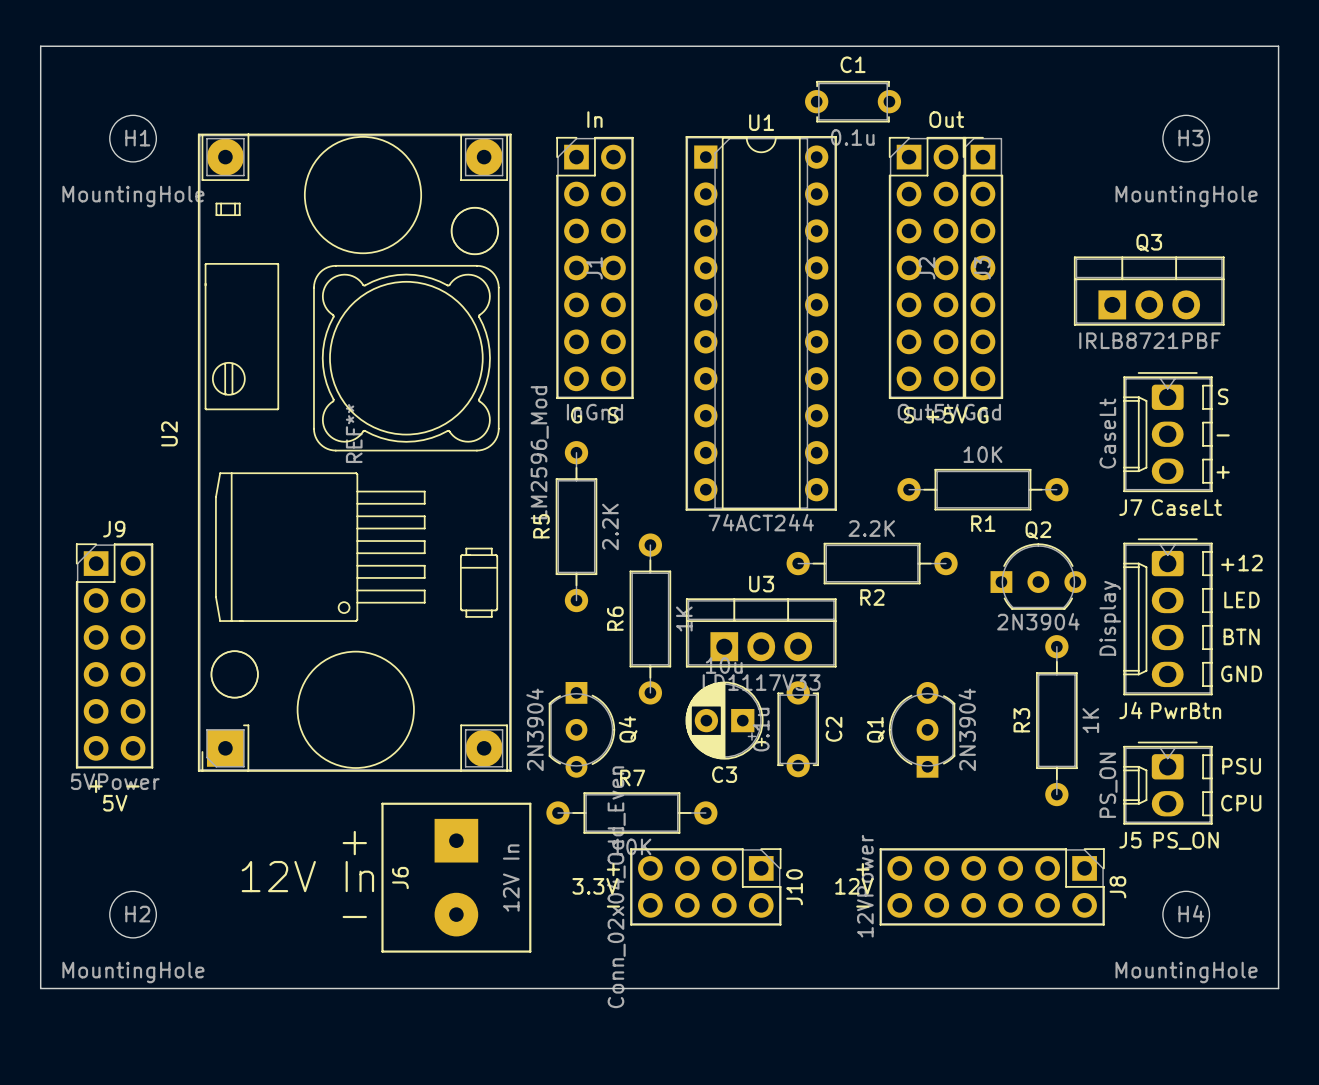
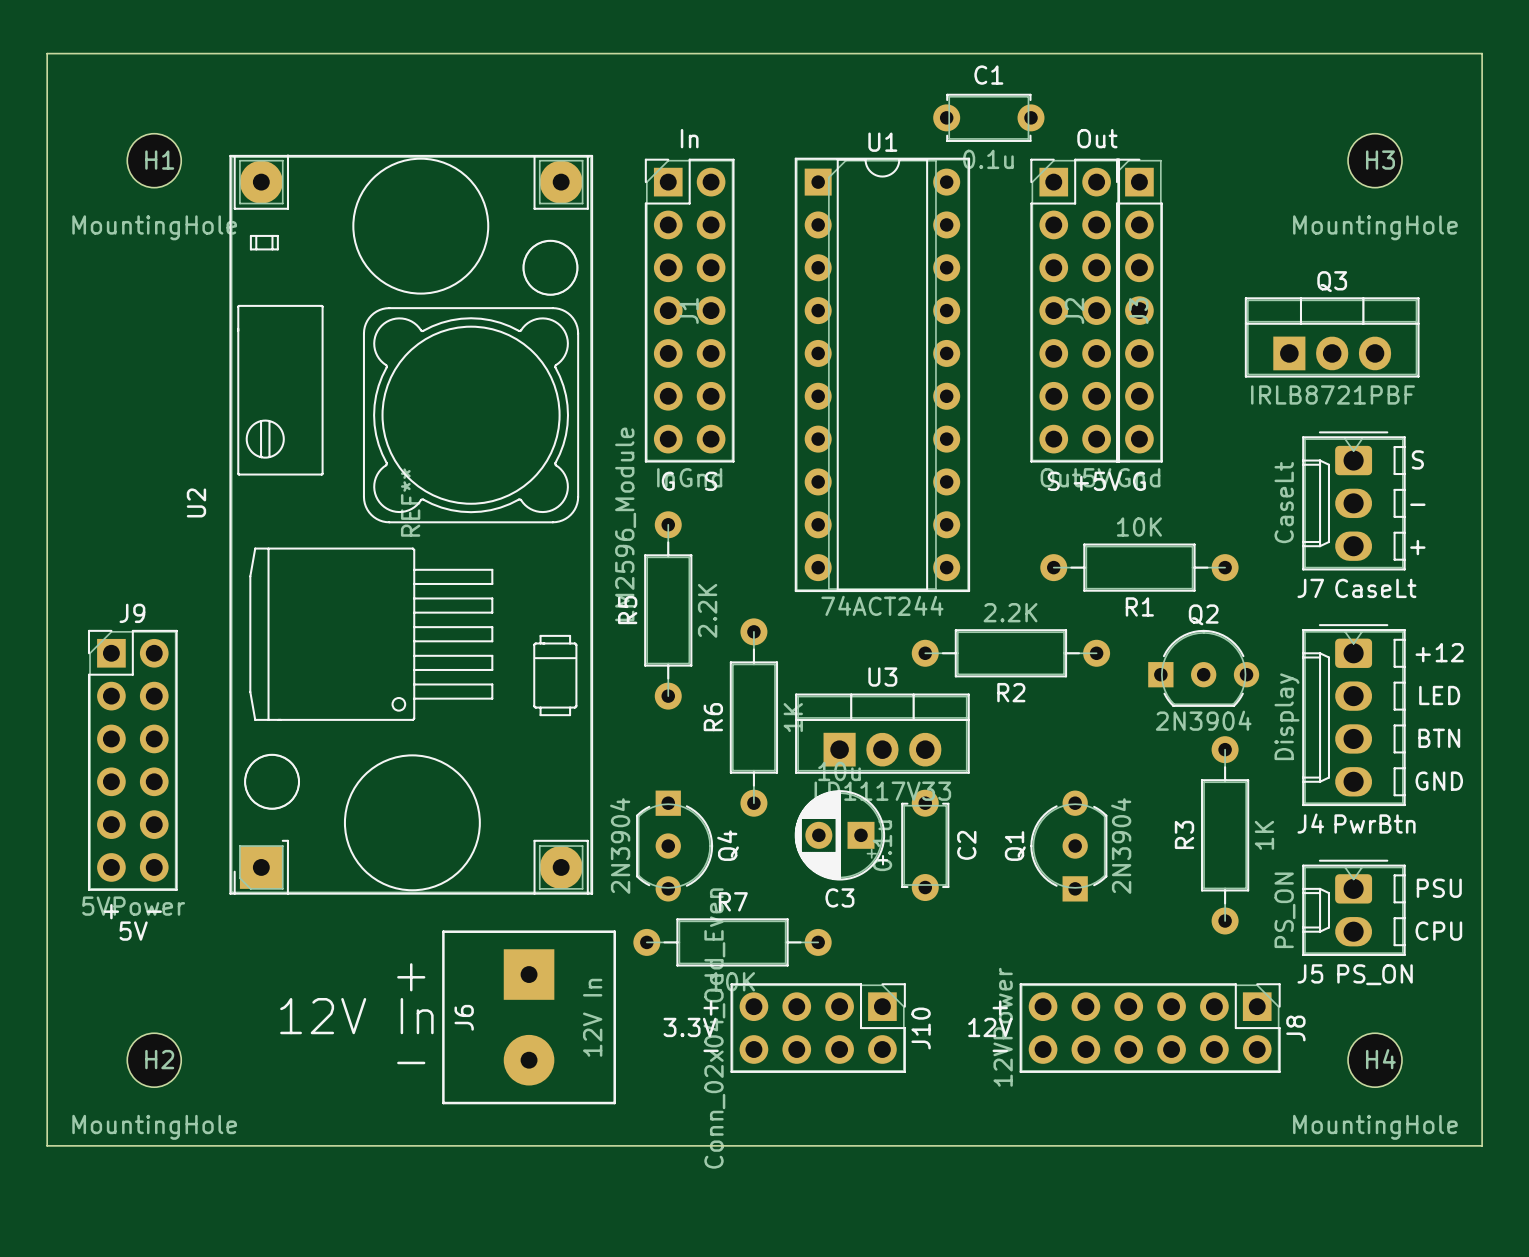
U2 value: LM2596_Mod (539, 452) -> LM2596_Module (625, 524)

